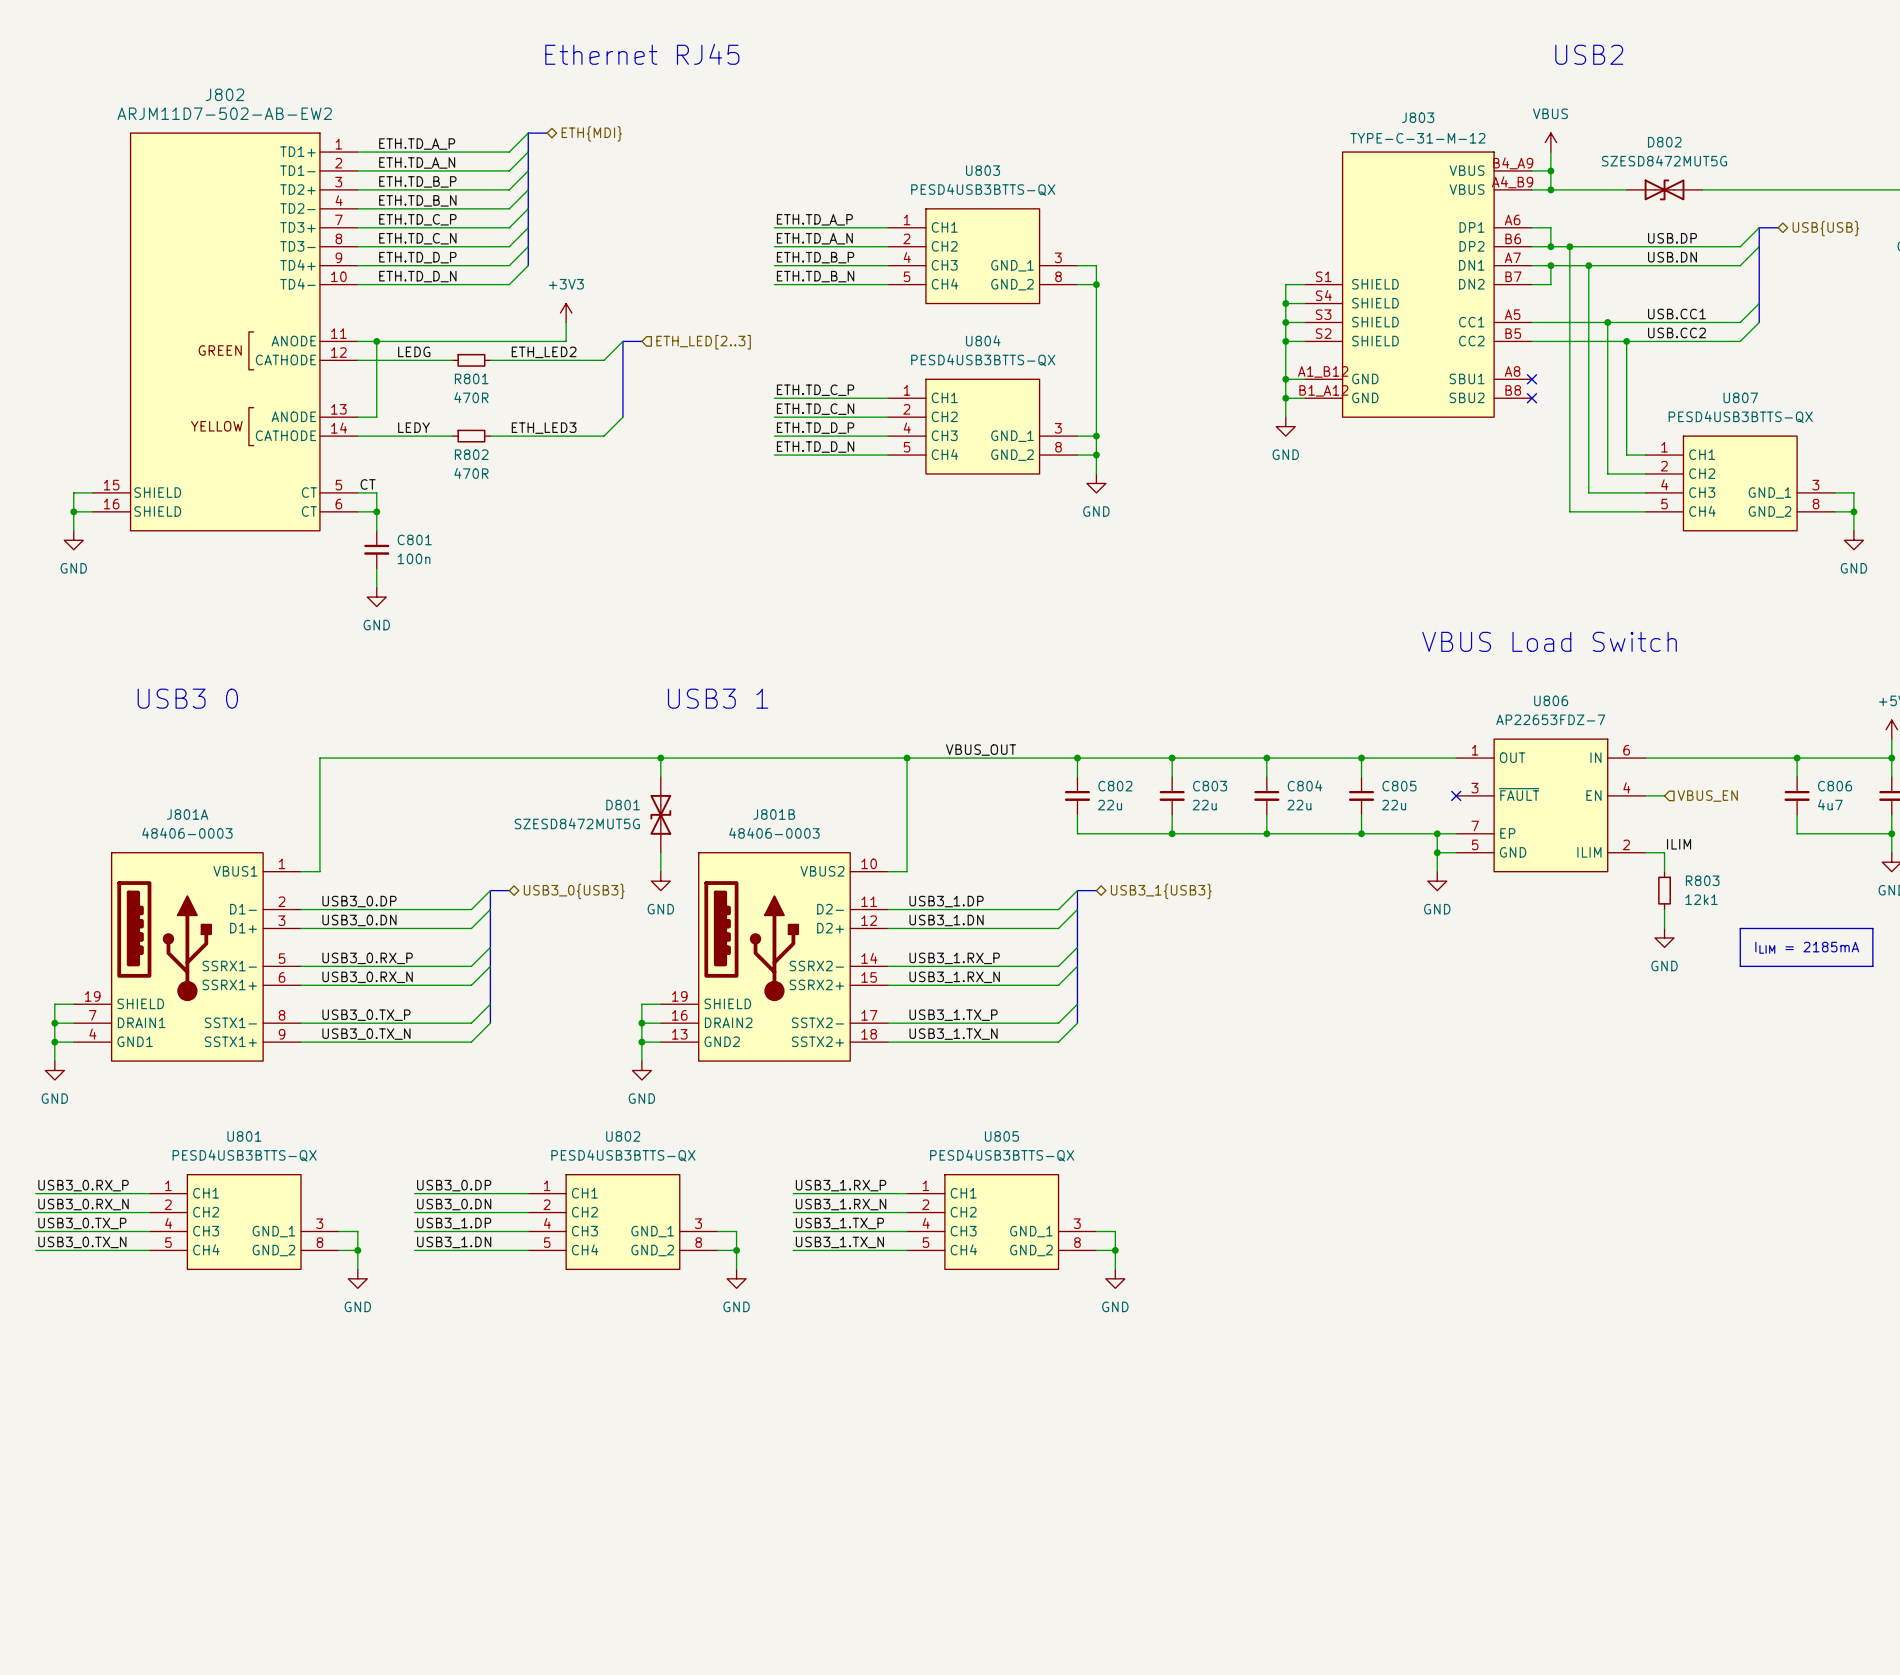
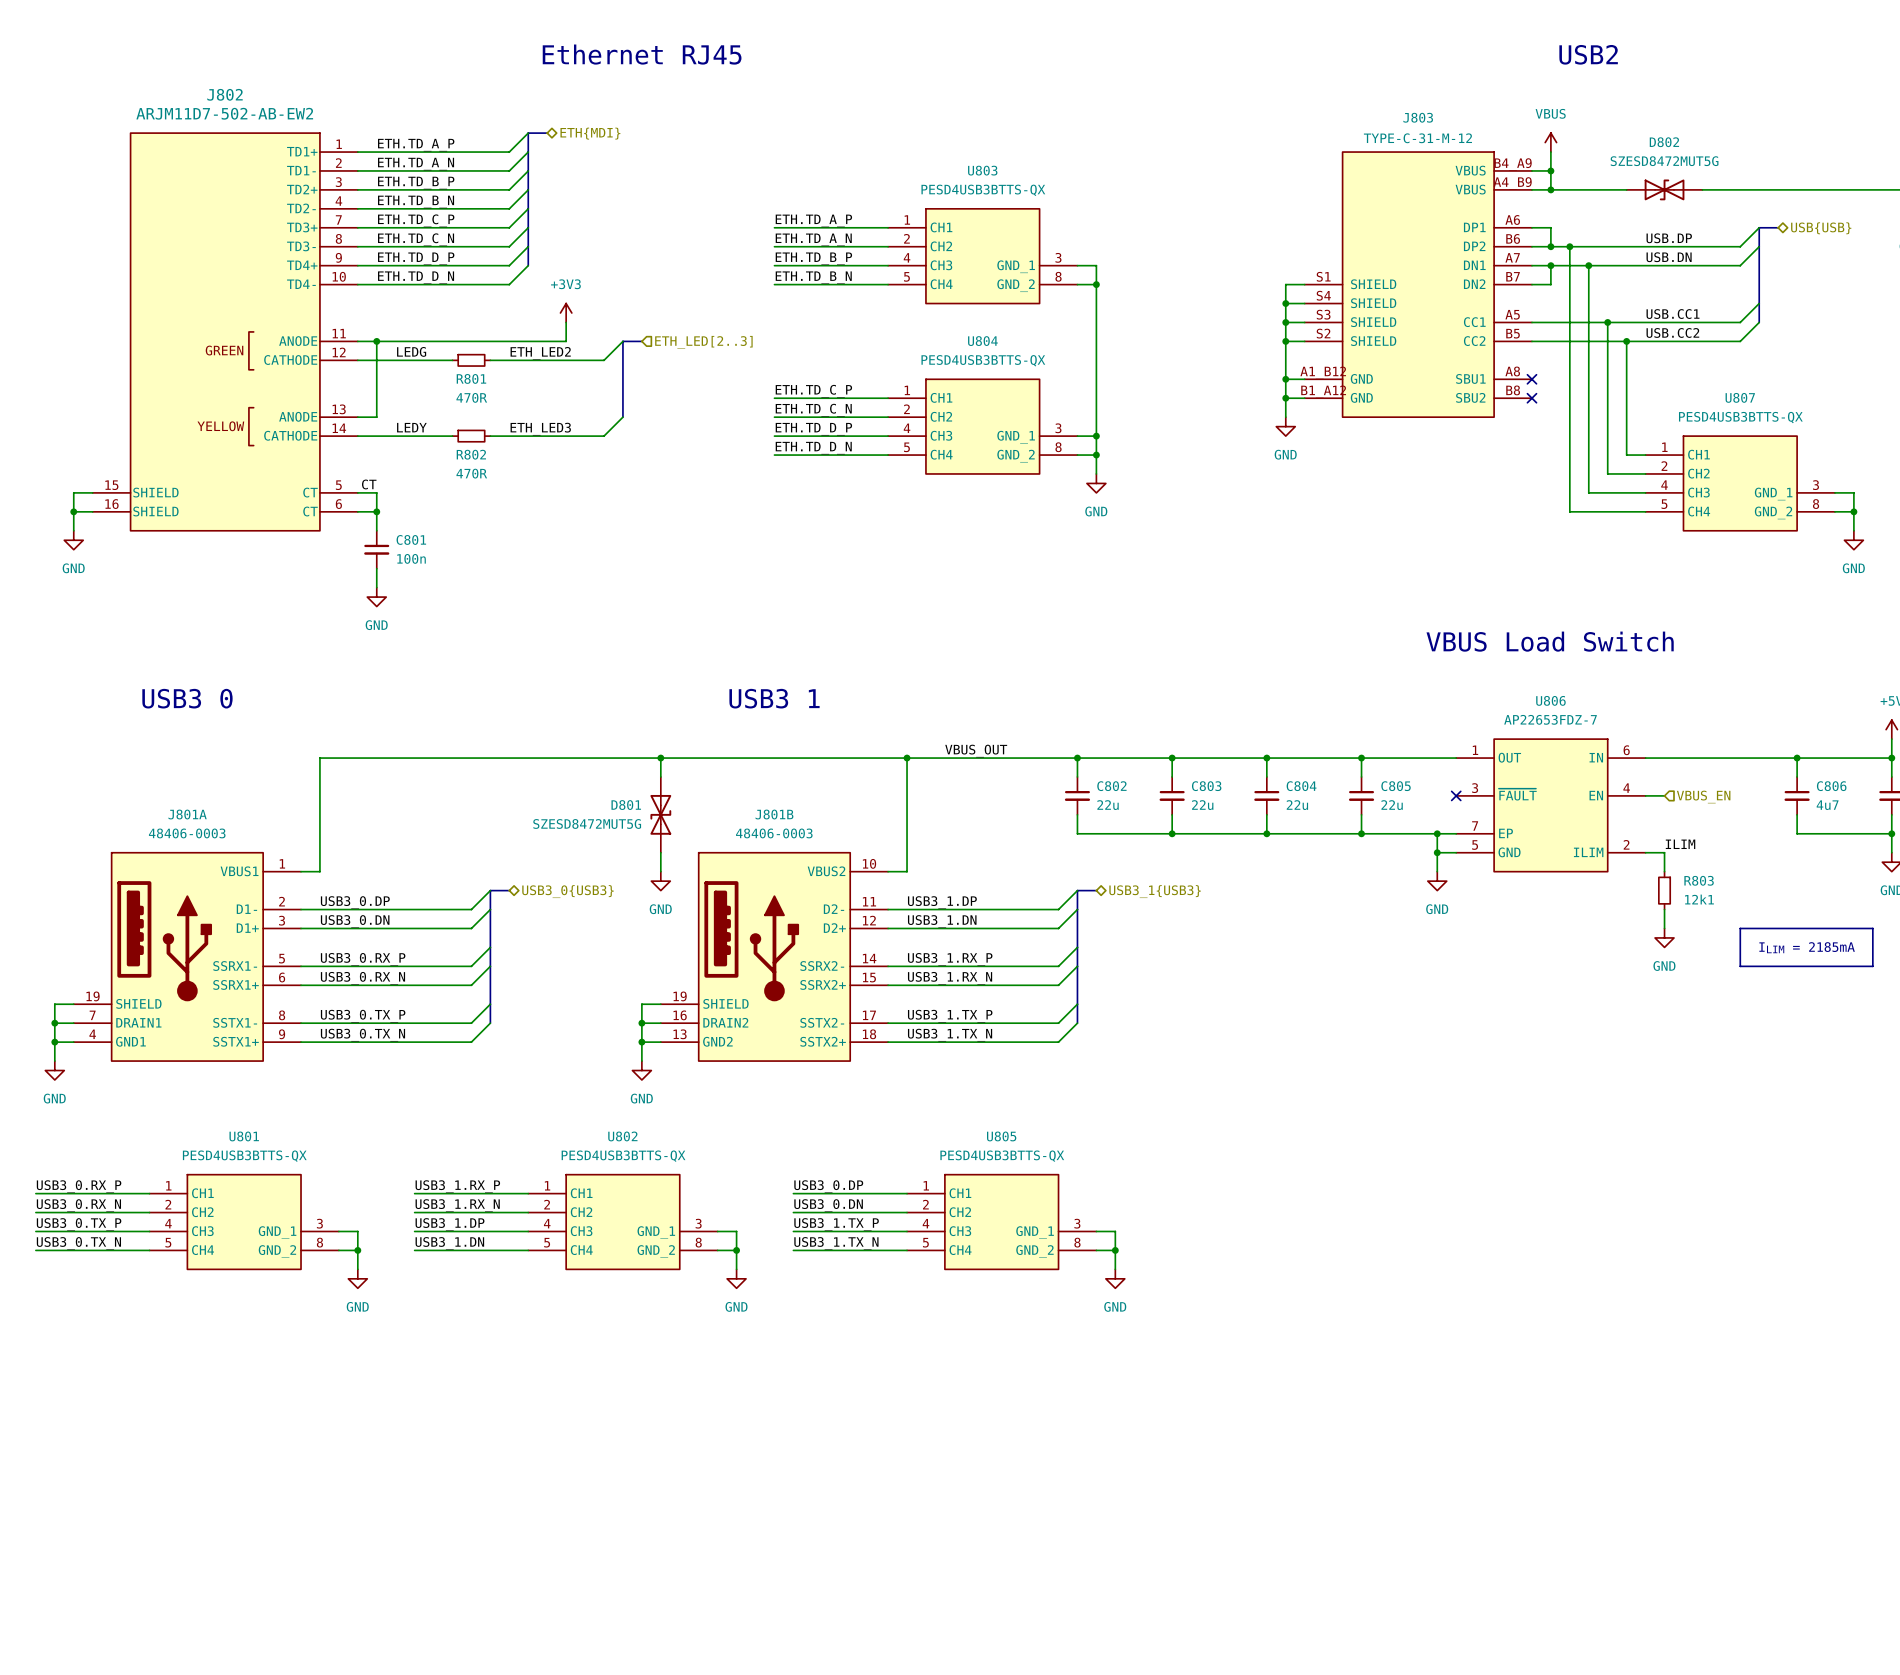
text position: USB3 1 (718, 698) -> USB3 1 (774, 698)
label: USB3_0.DP (454, 1185) -> USB3_1.RX_P (457, 1186)
label: USB3_1.RX_P (841, 1185) -> USB3_0.DP (828, 1186)
label: USB3_0.DN (454, 1204) -> USB3_1.RX_N (457, 1205)
label: USB3_1.RX_N (841, 1204) -> USB3_0.DN (828, 1205)

